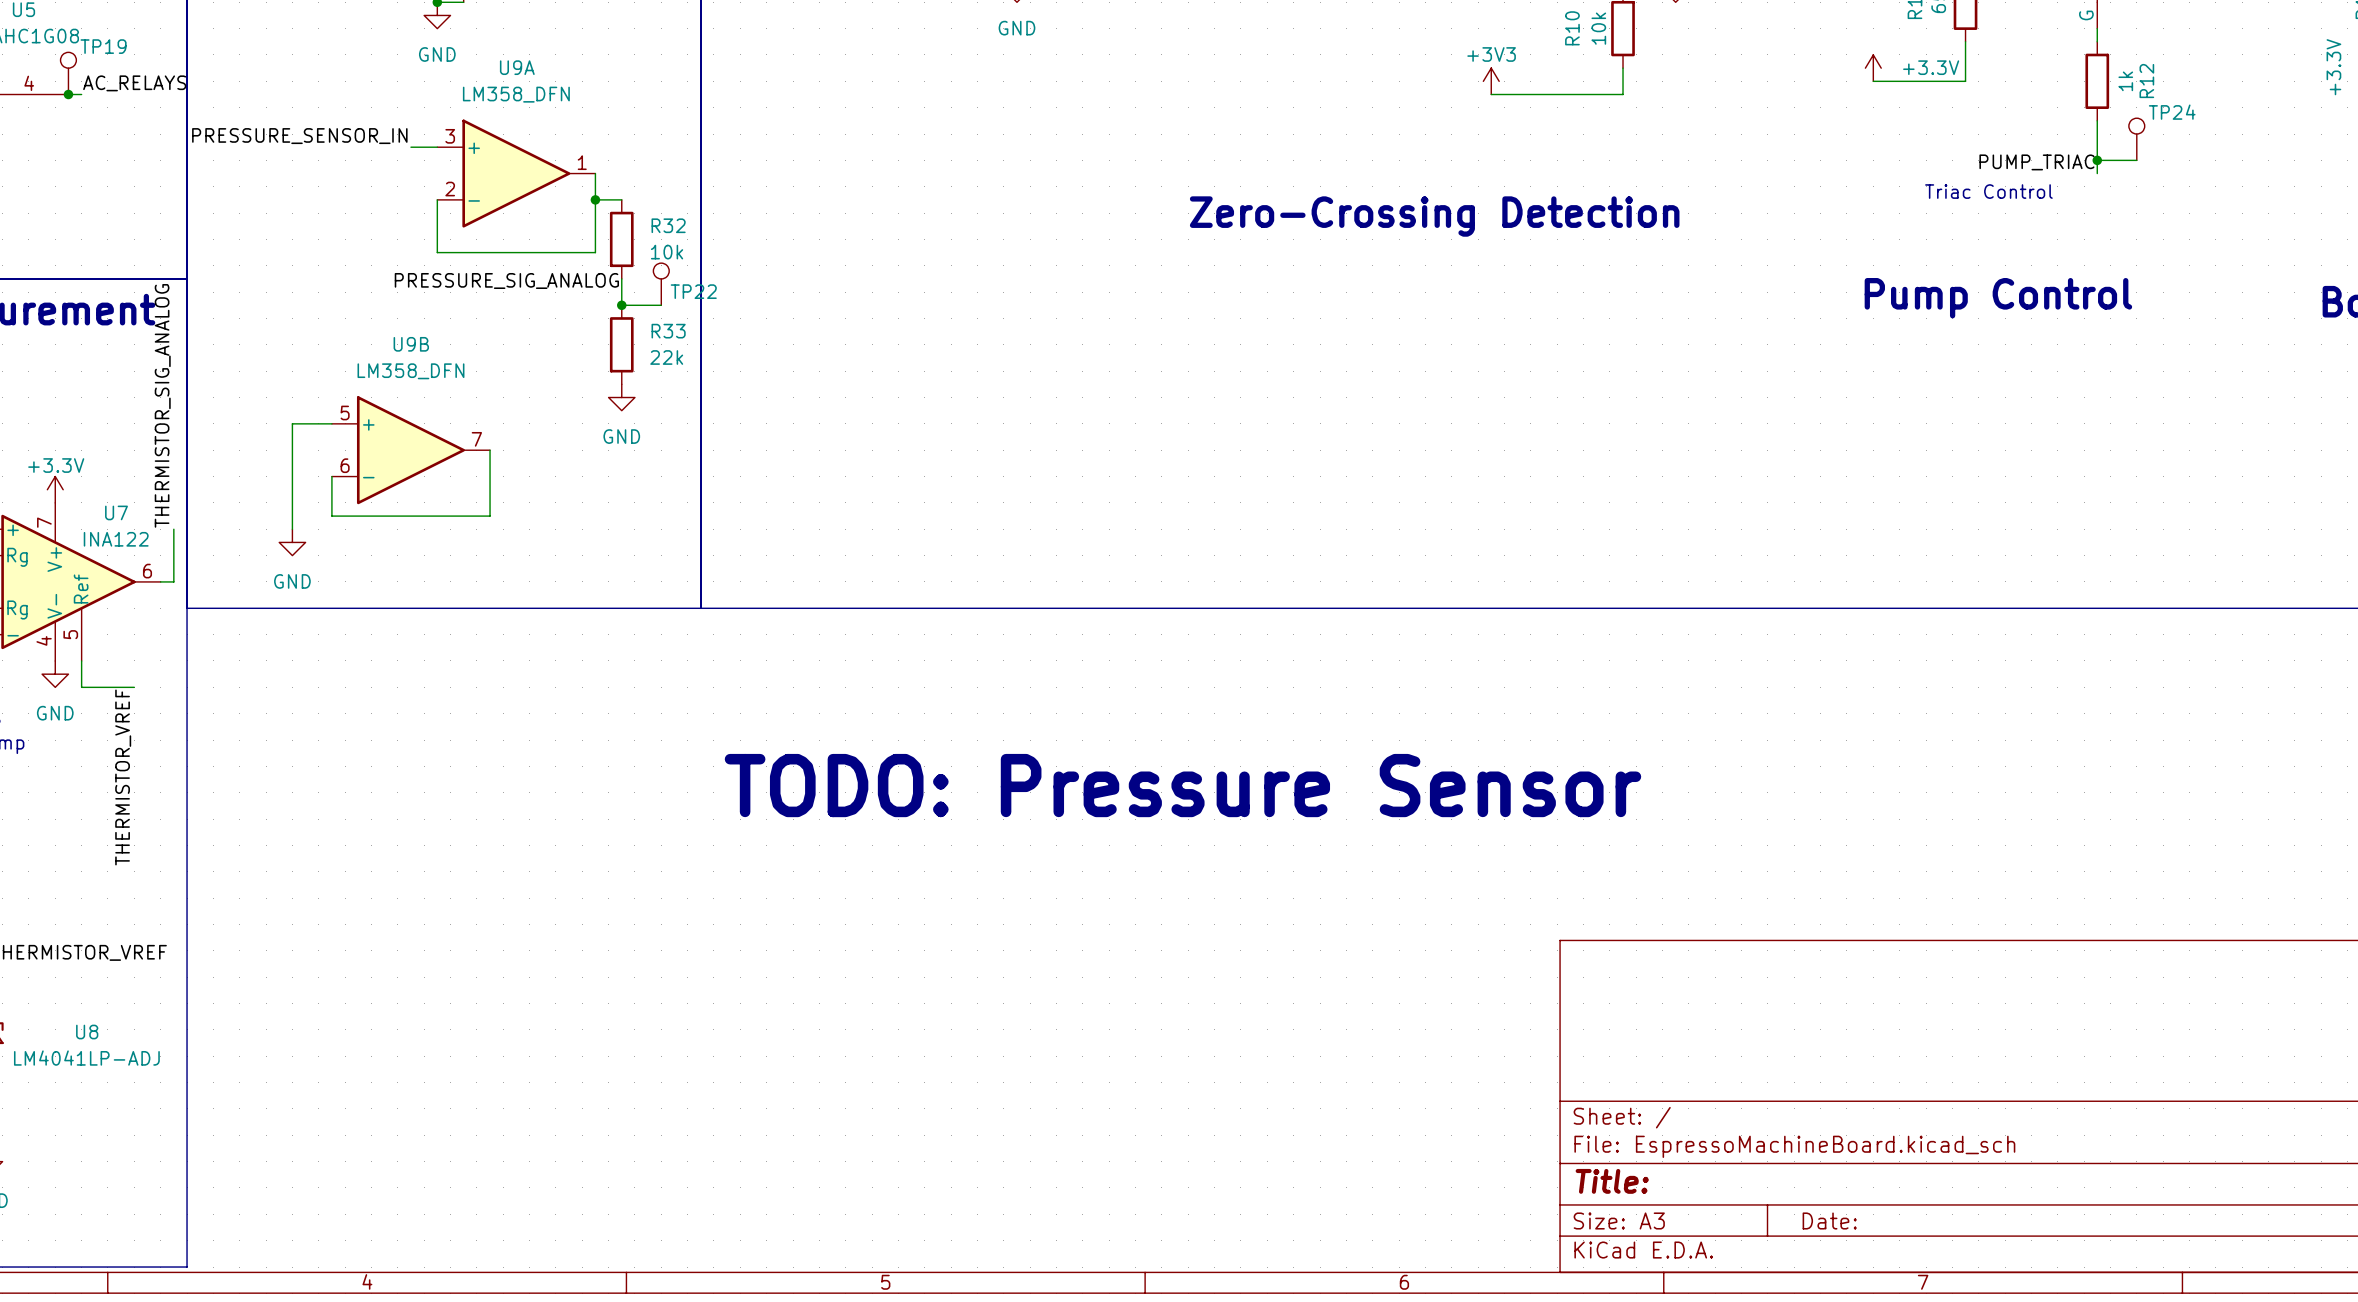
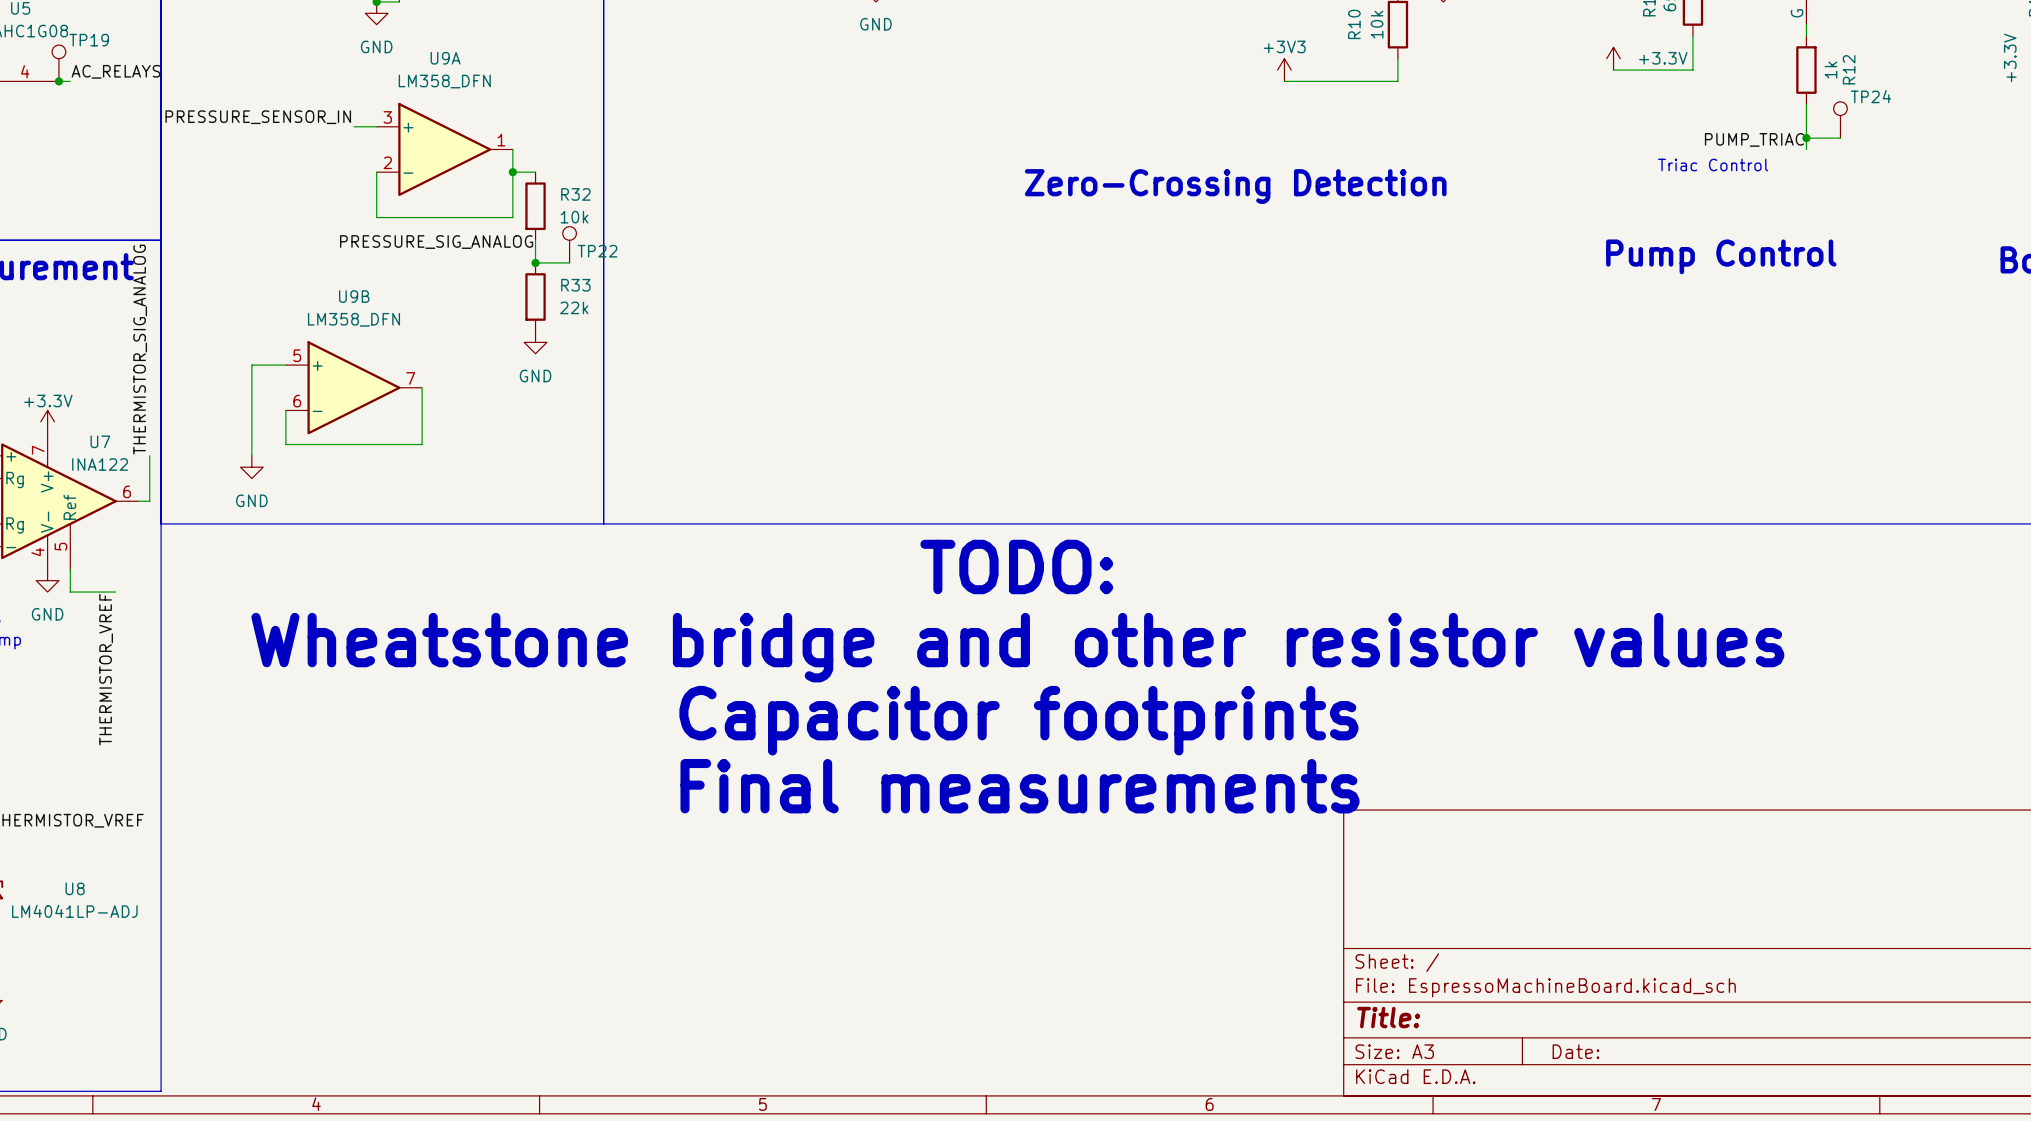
text: none -> TODO: (1016, 566)
text: none -> Wheatstone bridge and other resistor values (1017, 647)
text: TODO: Pressure Sensor (1182, 785) -> none
text: none -> Capacitor footprints (1018, 720)
text: none -> Final measurements (1020, 786)

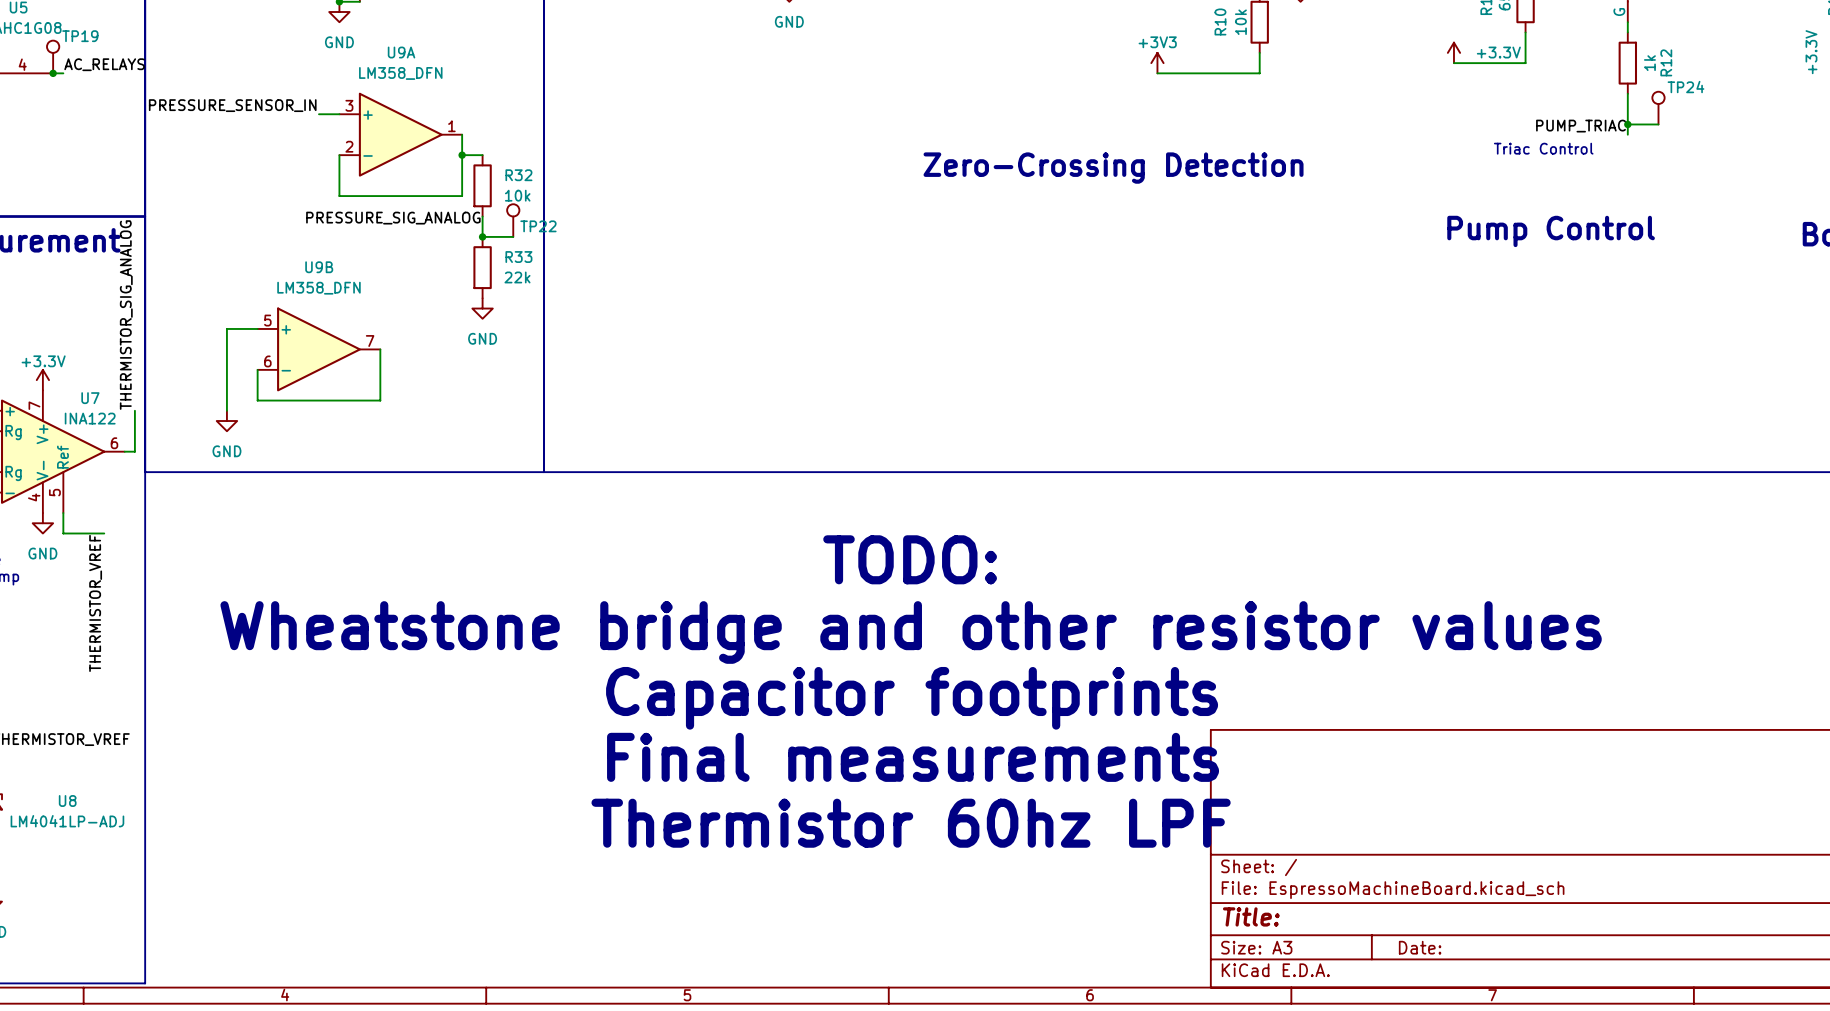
text position: TODO: (1016, 566) -> TODO: (910, 559)
text position: Wheatstone bridge and other resistor values (1017, 647) -> Wheatstone bridge and other resistor values (911, 632)
text position: Capacitor footprints (1018, 720) -> Capacitor footprints (912, 698)
text position: Final measurements (1020, 786) -> Final measurements (913, 757)
text: none -> Thermistor 60hz LPF (911, 823)

